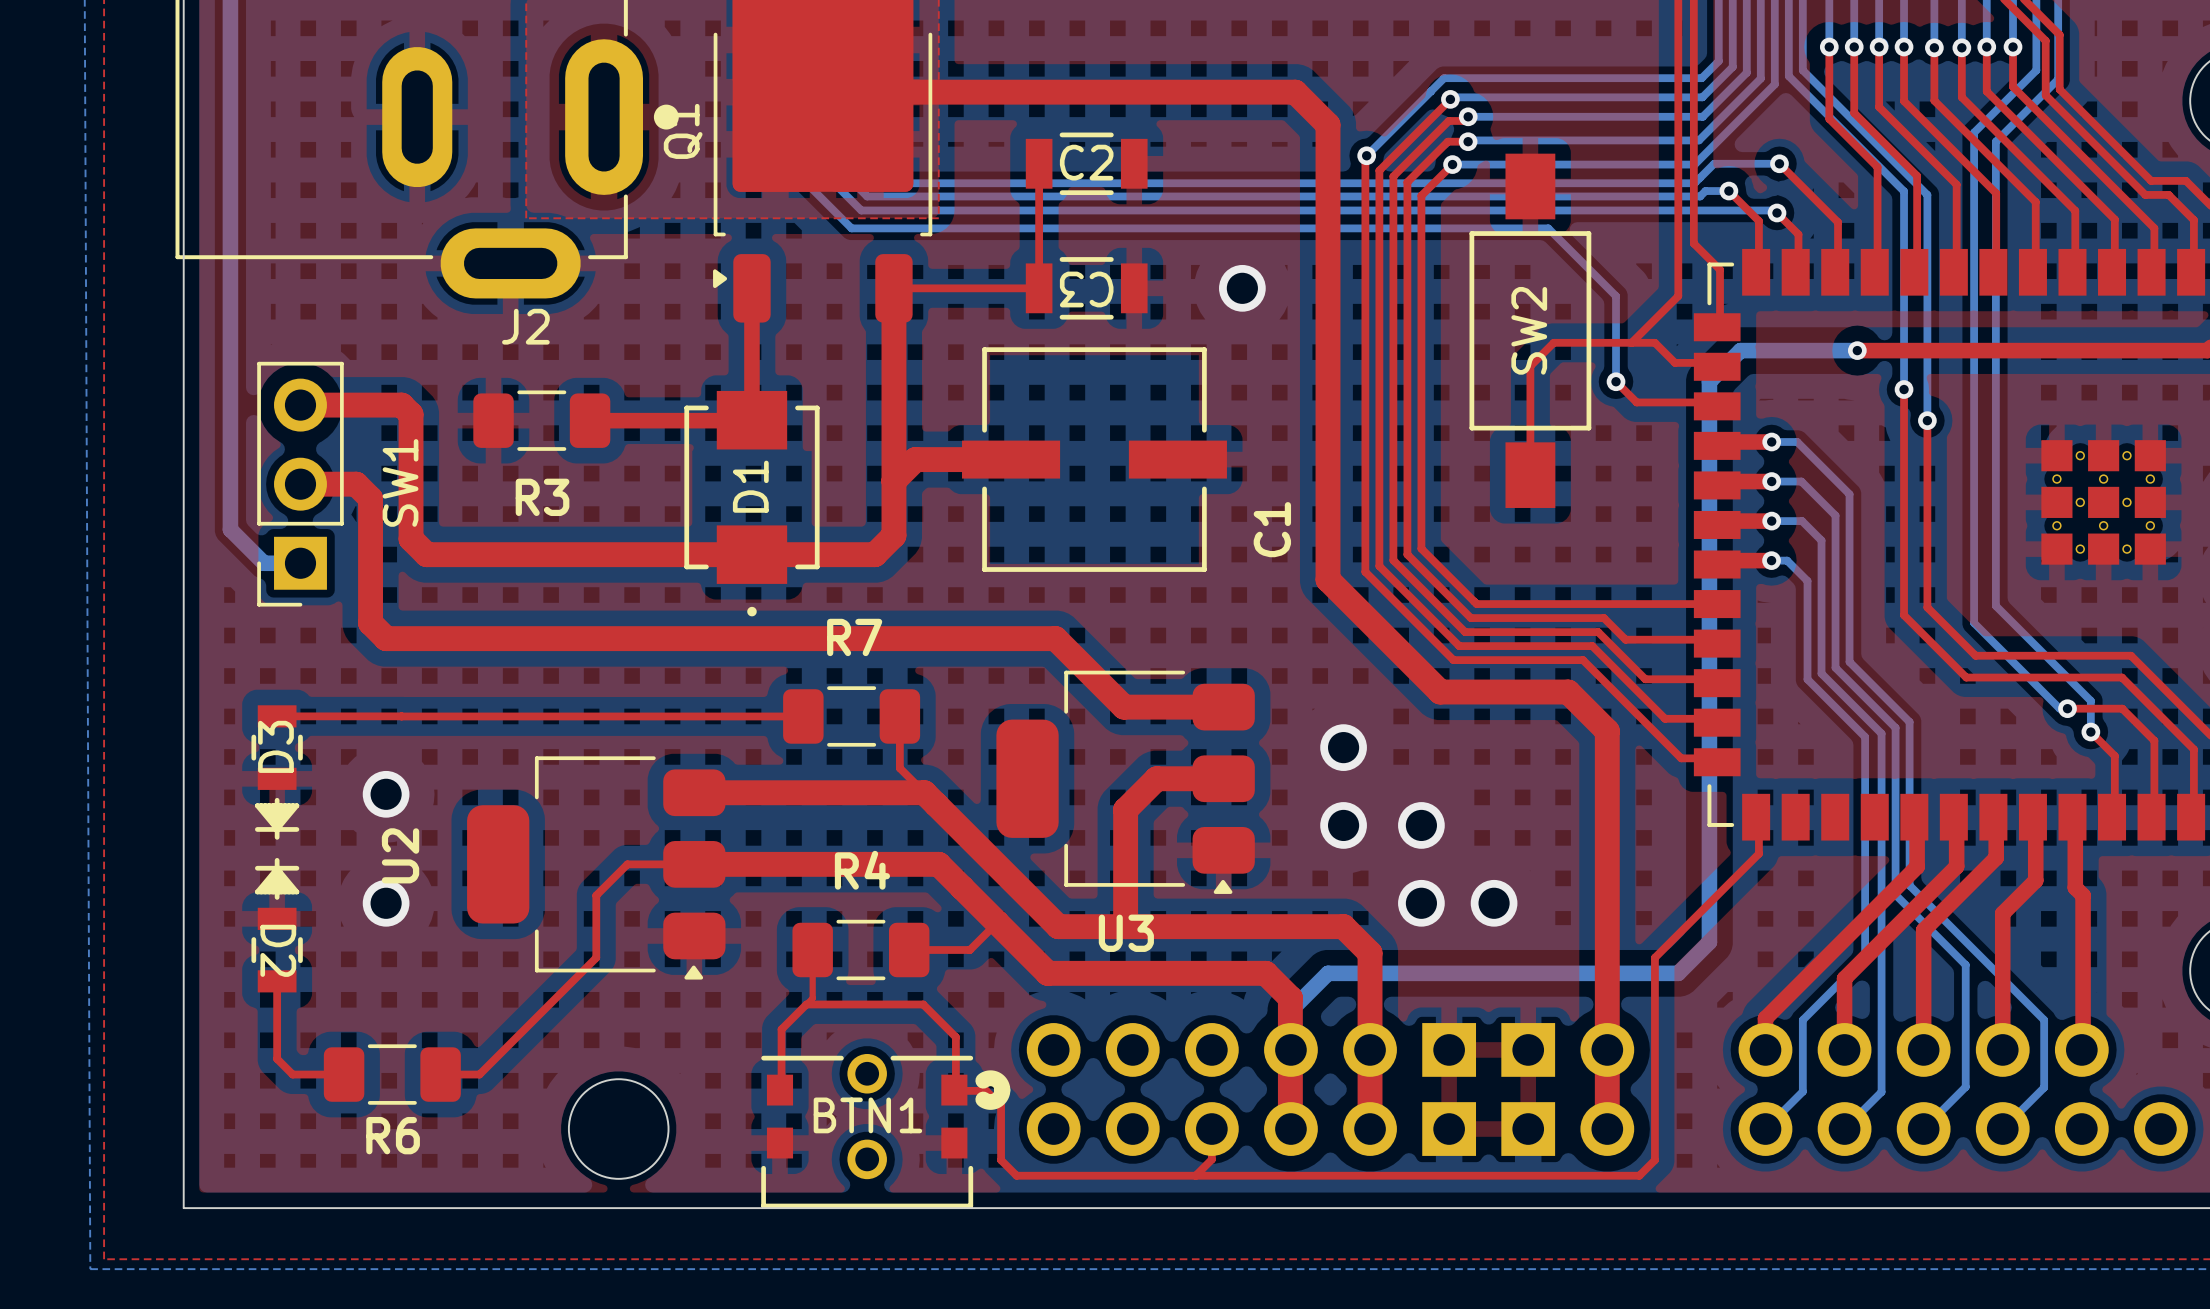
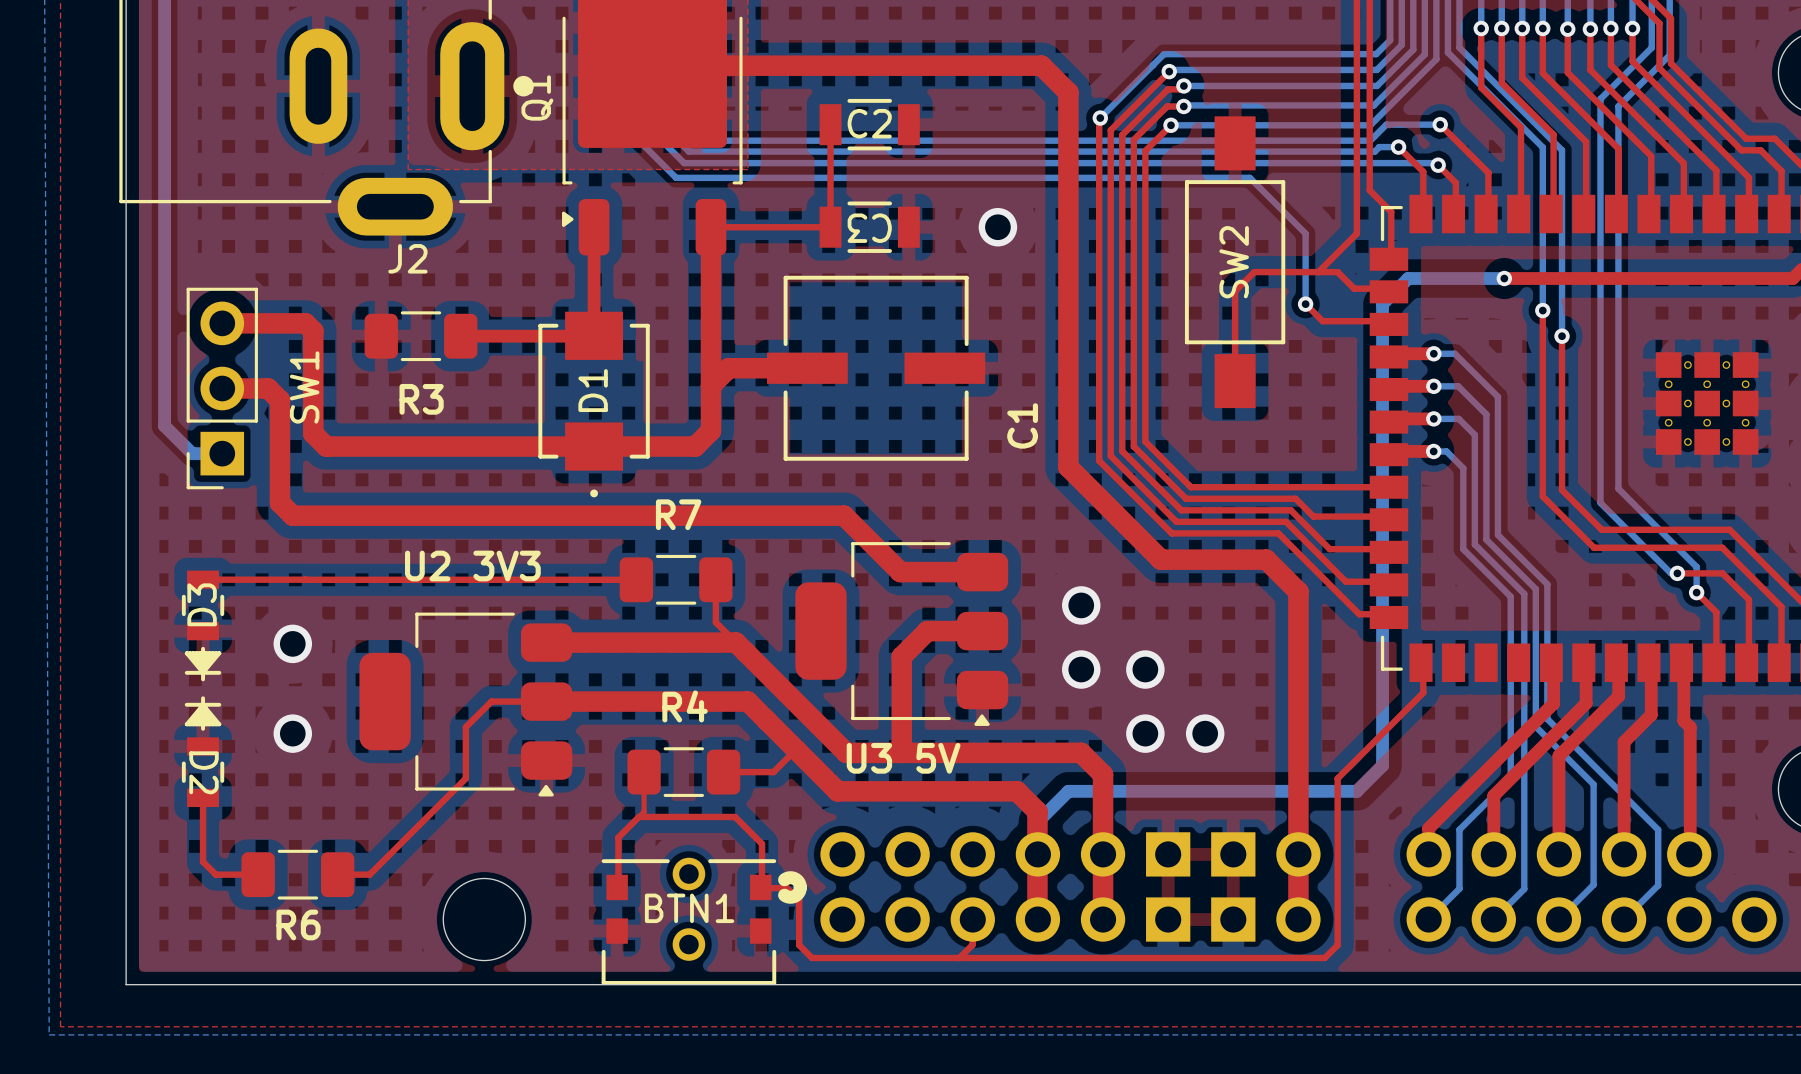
U2 name: U2 (400, 855) -> U2 3V3 (472, 566)
U3 name: U3 (1126, 933) -> U3 5V (903, 758)

